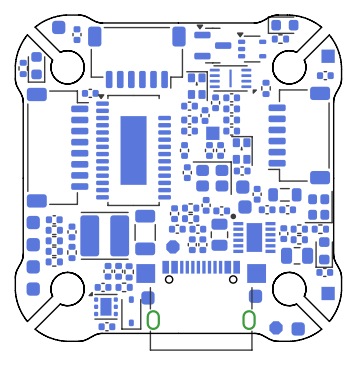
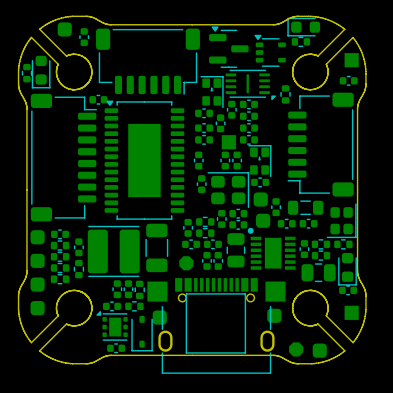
part footprint: [96, 94, 171, 207] -> [104, 100, 185, 220]
part: none -> (238, 213)
line: none -> (245, 293) (186, 293) (186, 352) (245, 352) (245, 293)

